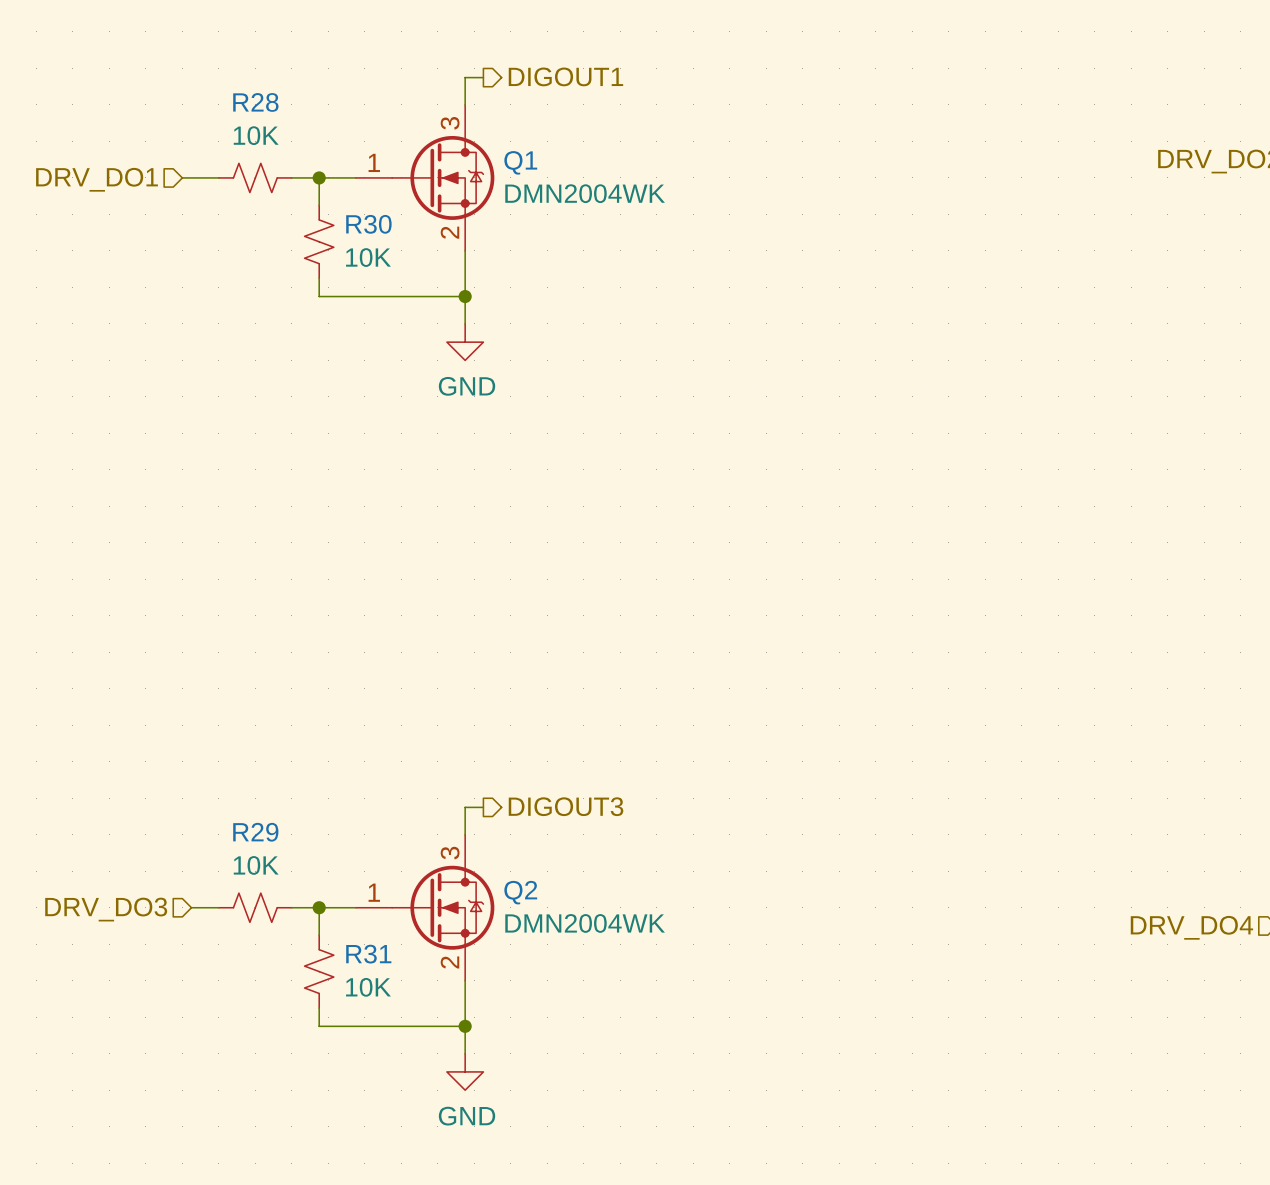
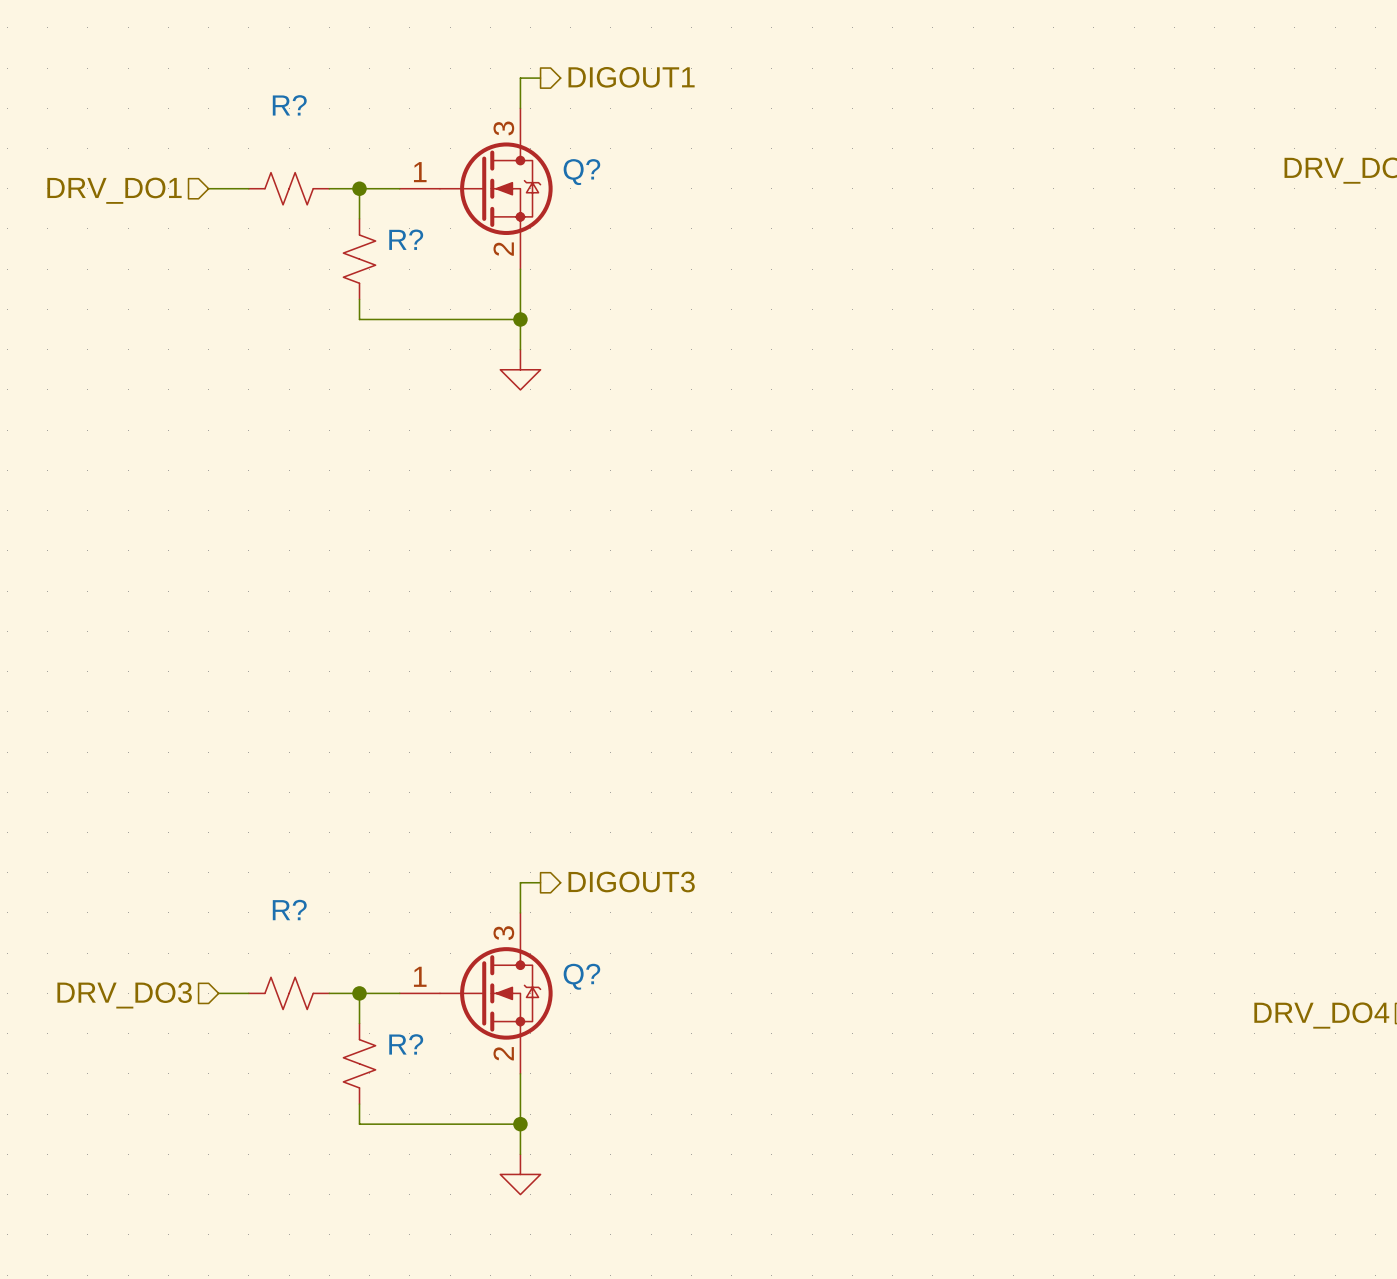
R28 name: R28 (255, 102) -> R? (289, 105)
R28 value: 10K (256, 135) -> none
Q1 name: Q1 (520, 162) -> Q? (581, 172)
Q1 value: DMN2004WK (585, 193) -> none
R30 name: R30 (368, 224) -> R? (406, 239)
R30 value: 10K (368, 257) -> none
power symbol text: GND (467, 386) -> none
R29 name: R29 (255, 832) -> R? (289, 910)
R29 value: 10K (256, 865) -> none
Q2 name: Q2 (520, 892) -> Q? (581, 976)
Q2 value: DMN2004WK (585, 923) -> none
R31 name: R31 (368, 954) -> R? (406, 1044)
R31 value: 10K (368, 987) -> none
power symbol text: GND (467, 1116) -> none

